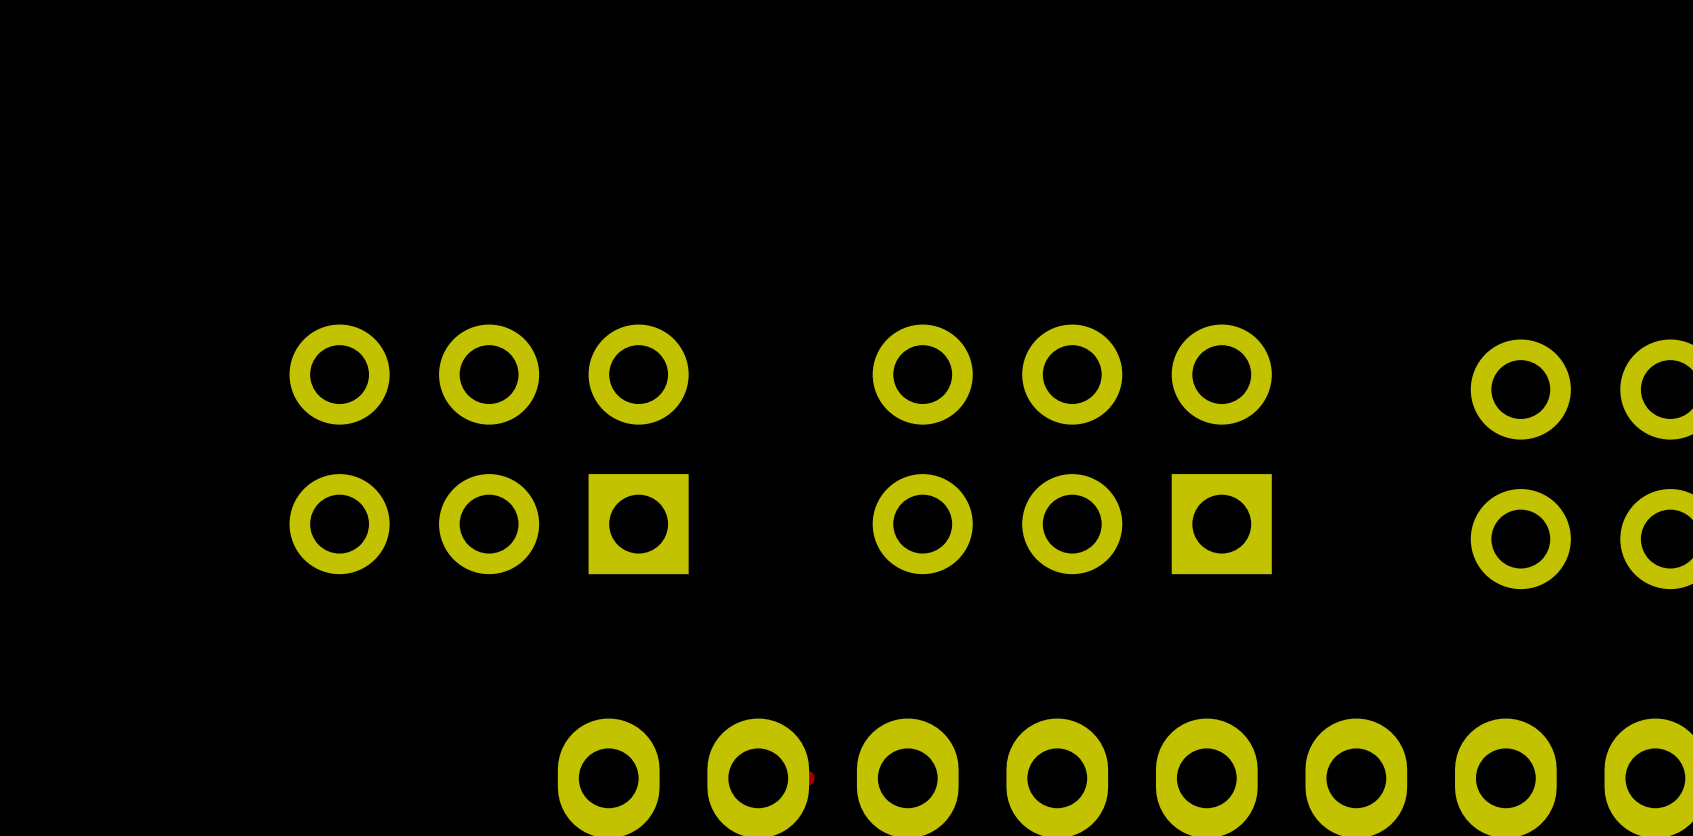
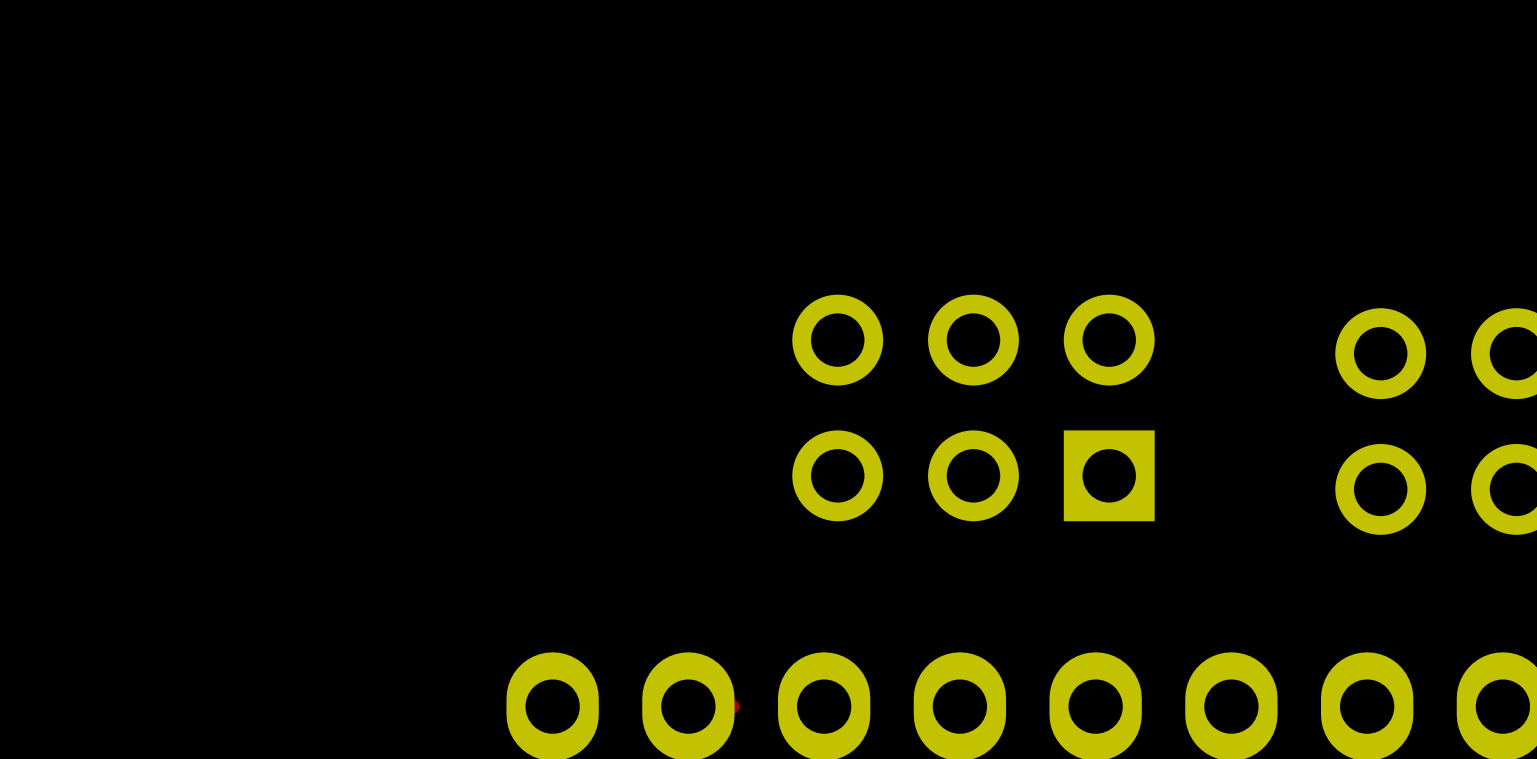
part: (489, 449) -> none

